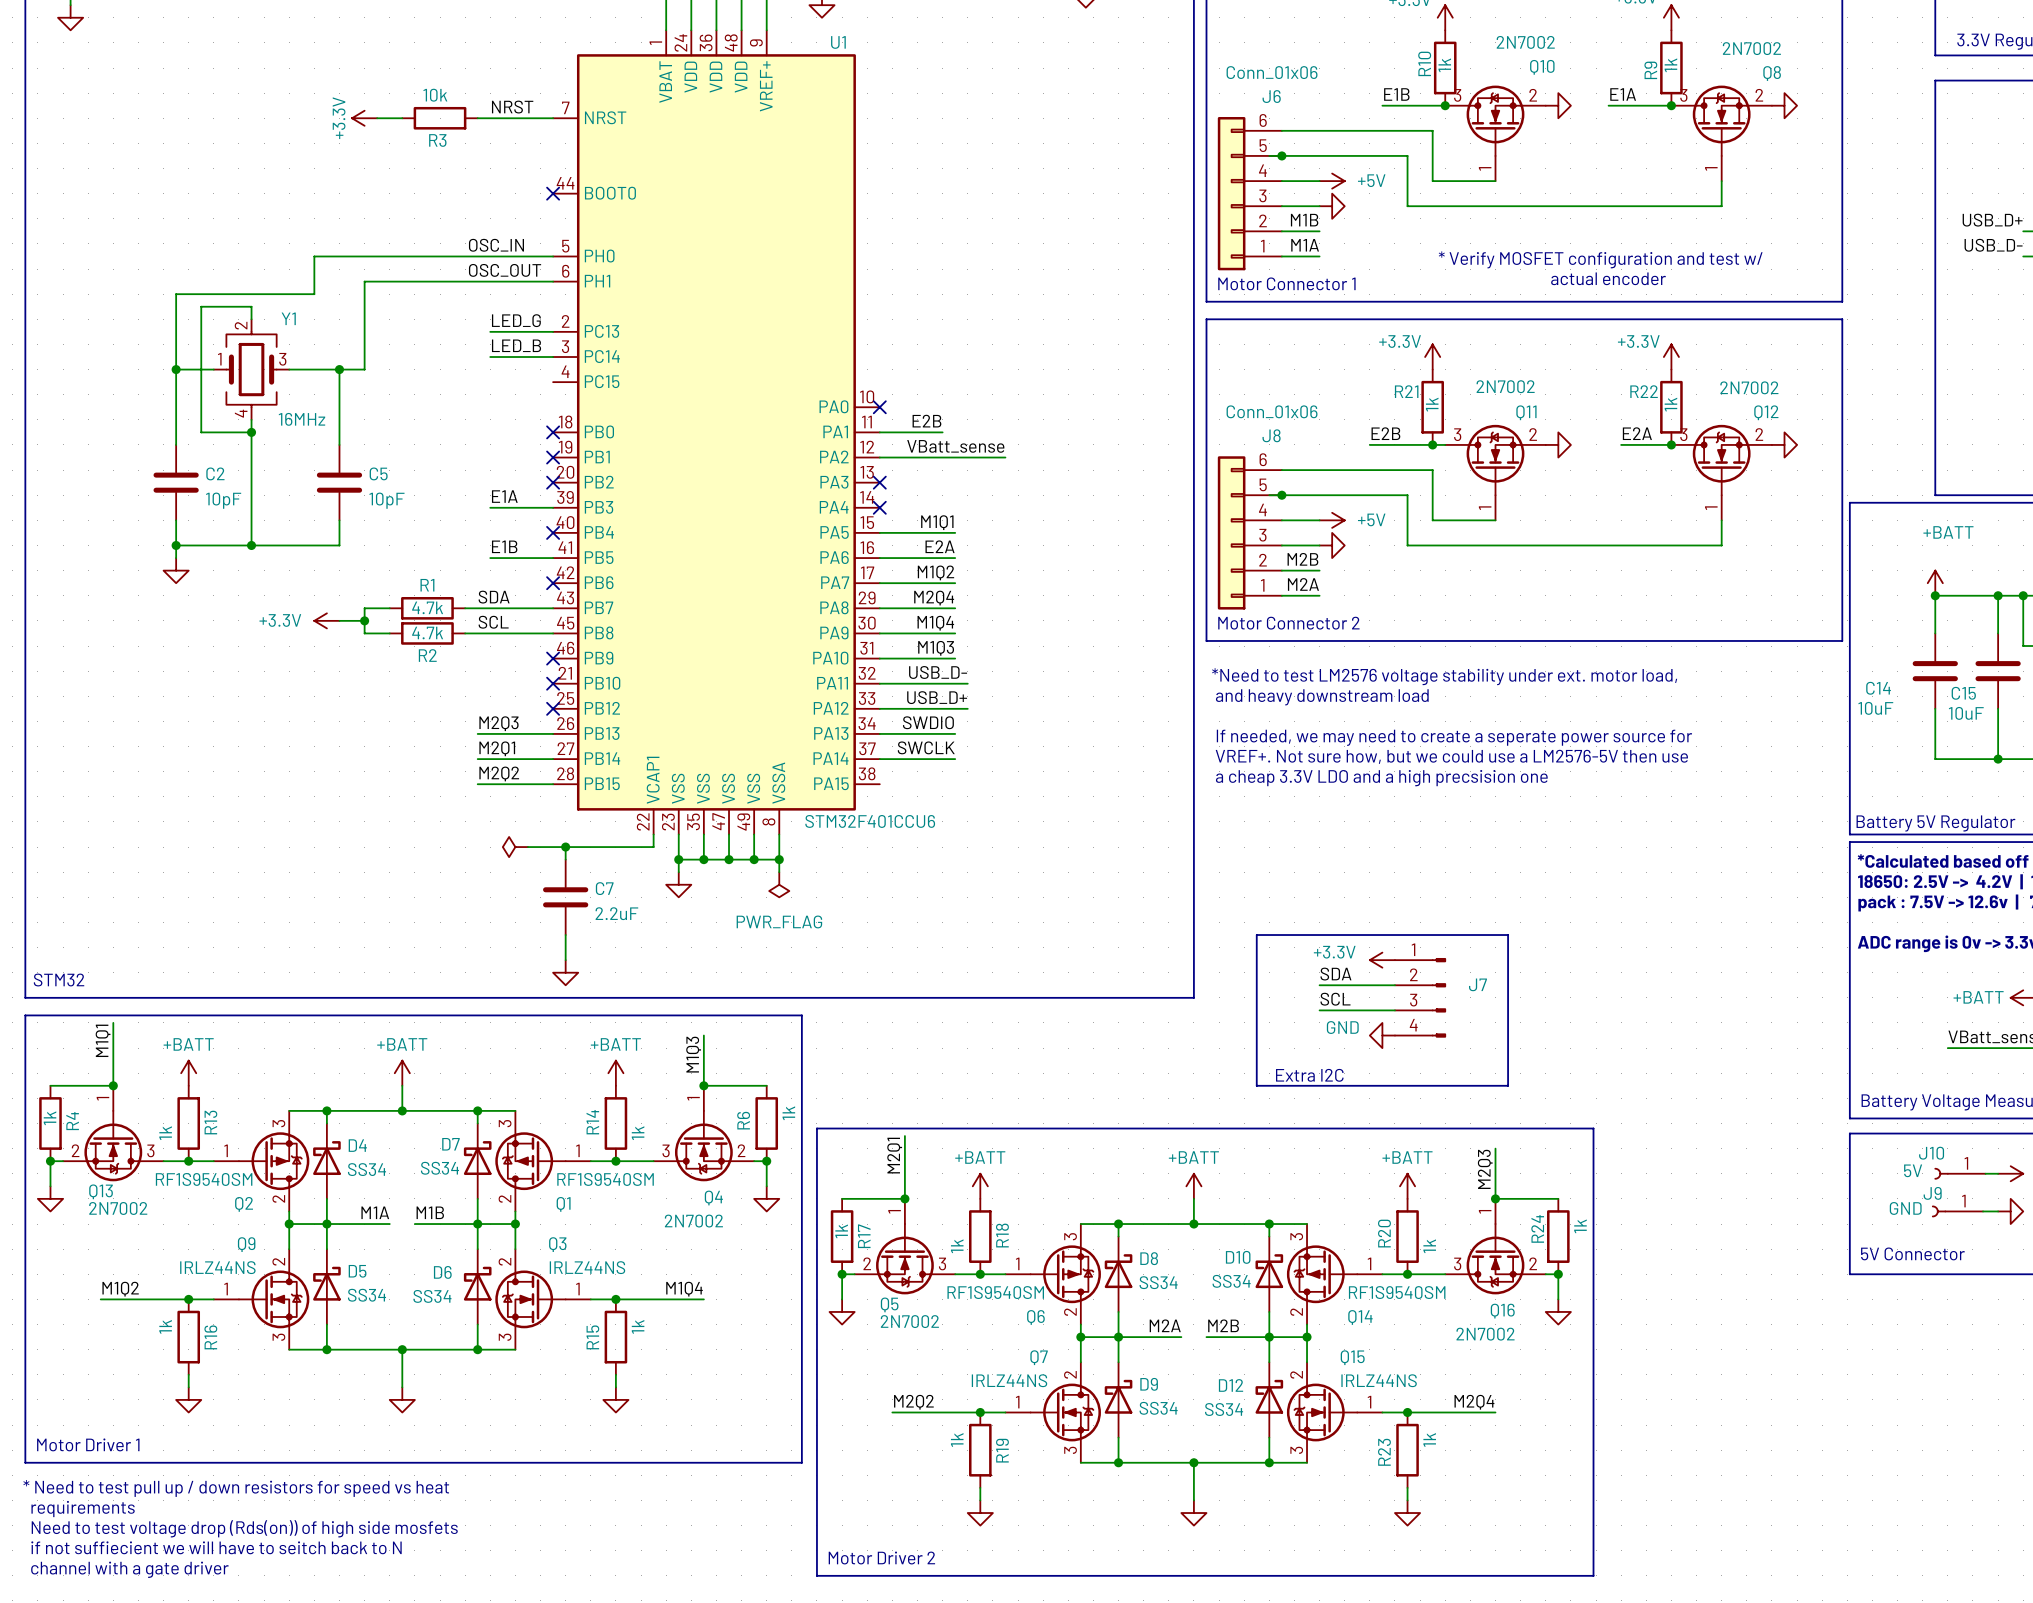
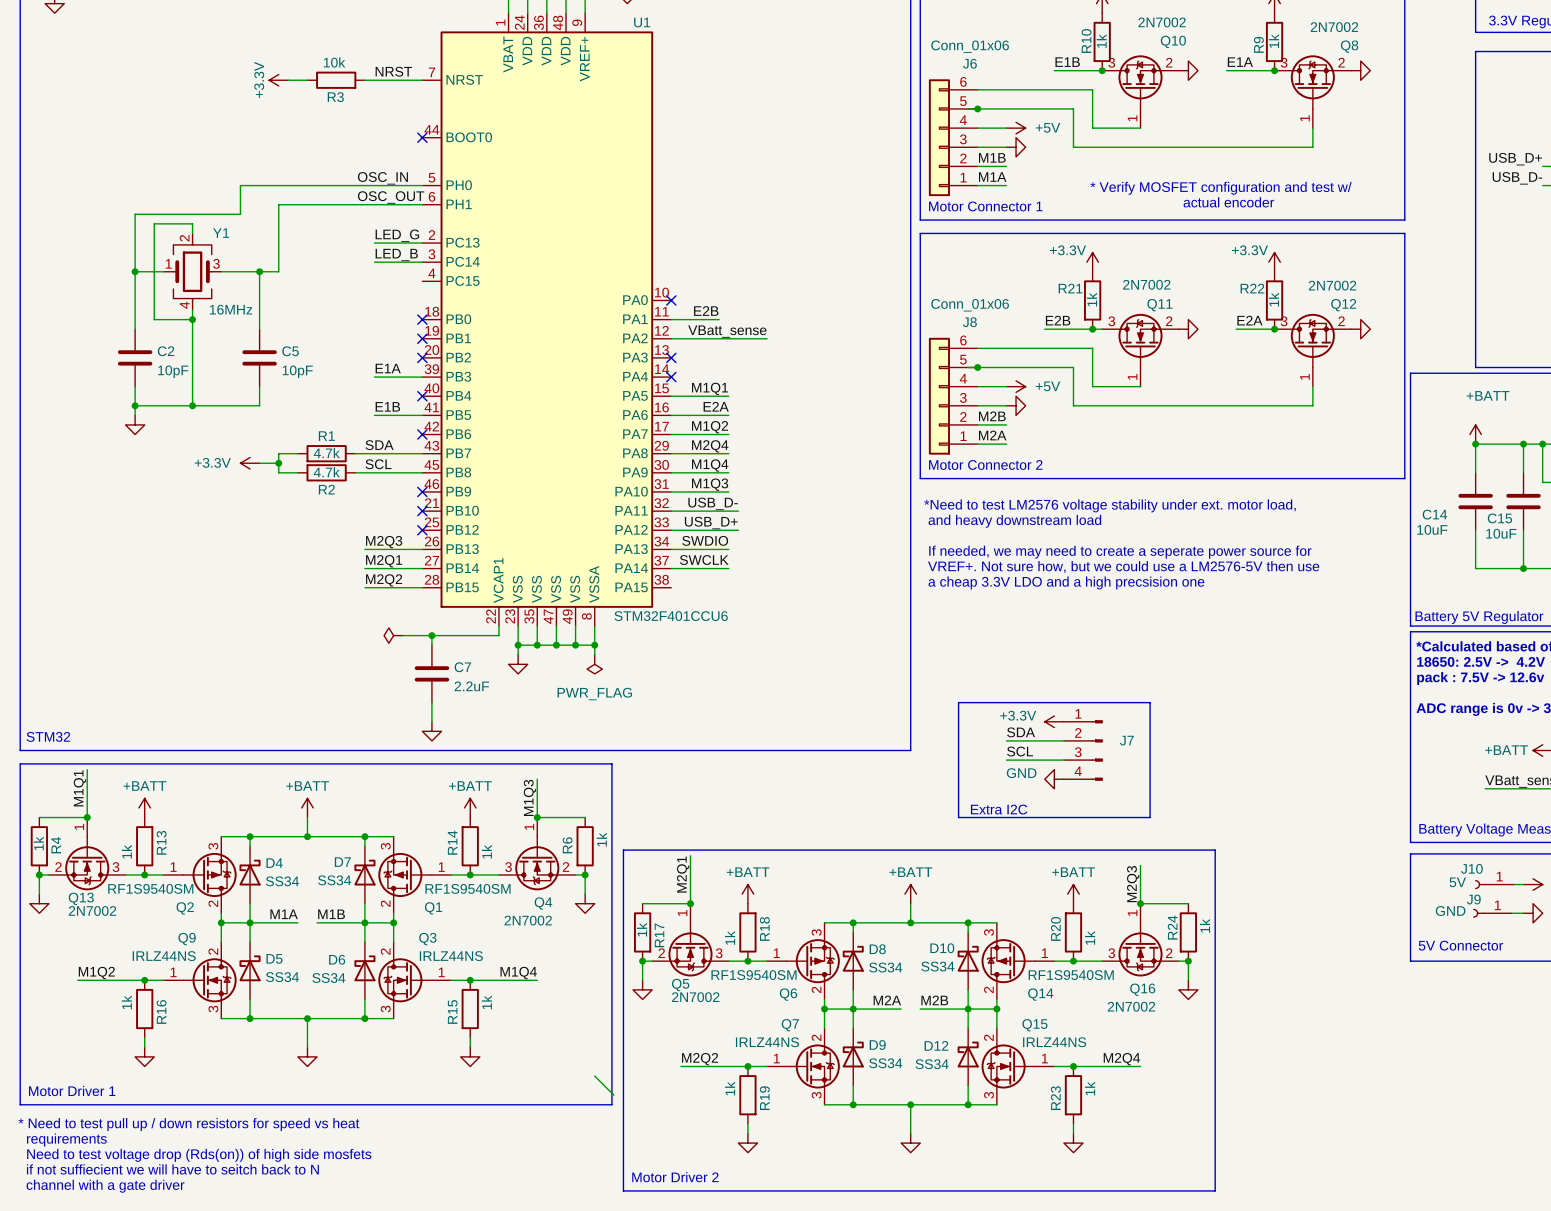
wire: none -> (594, 1076) (613, 1095)

